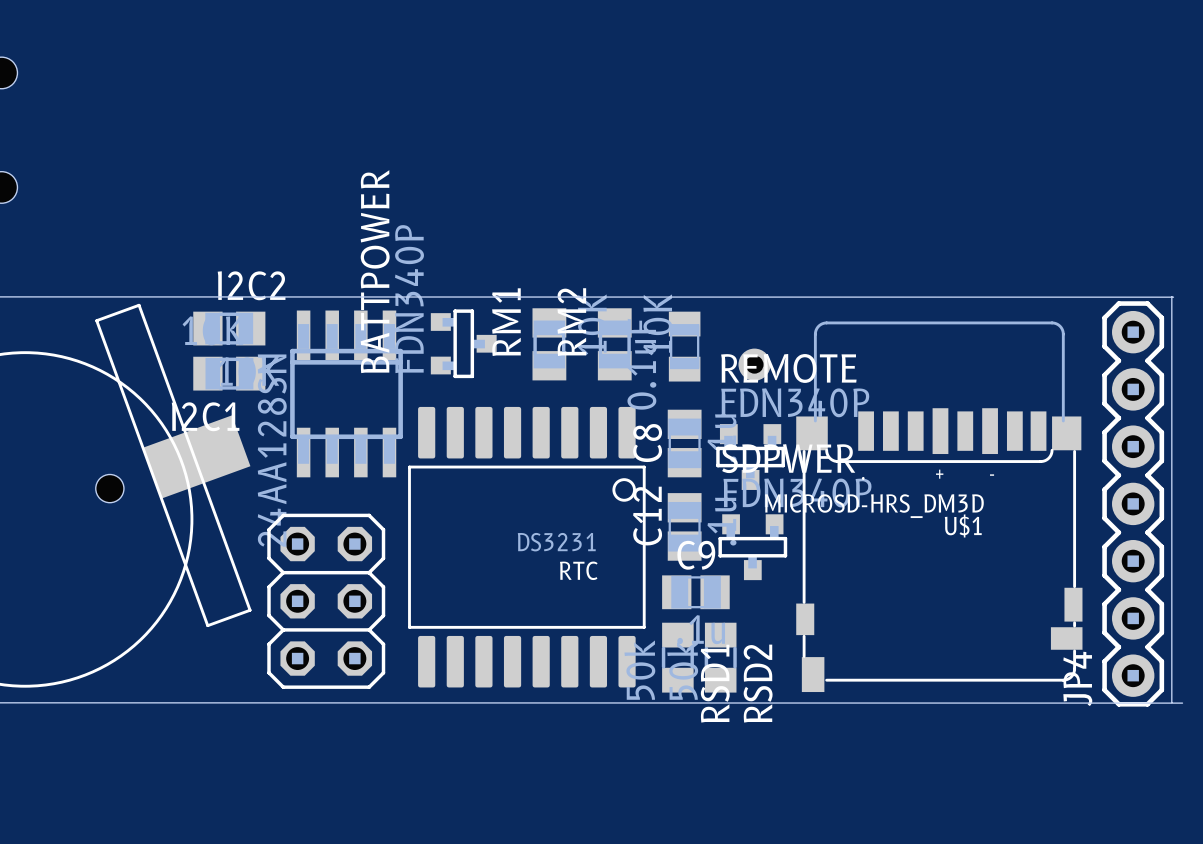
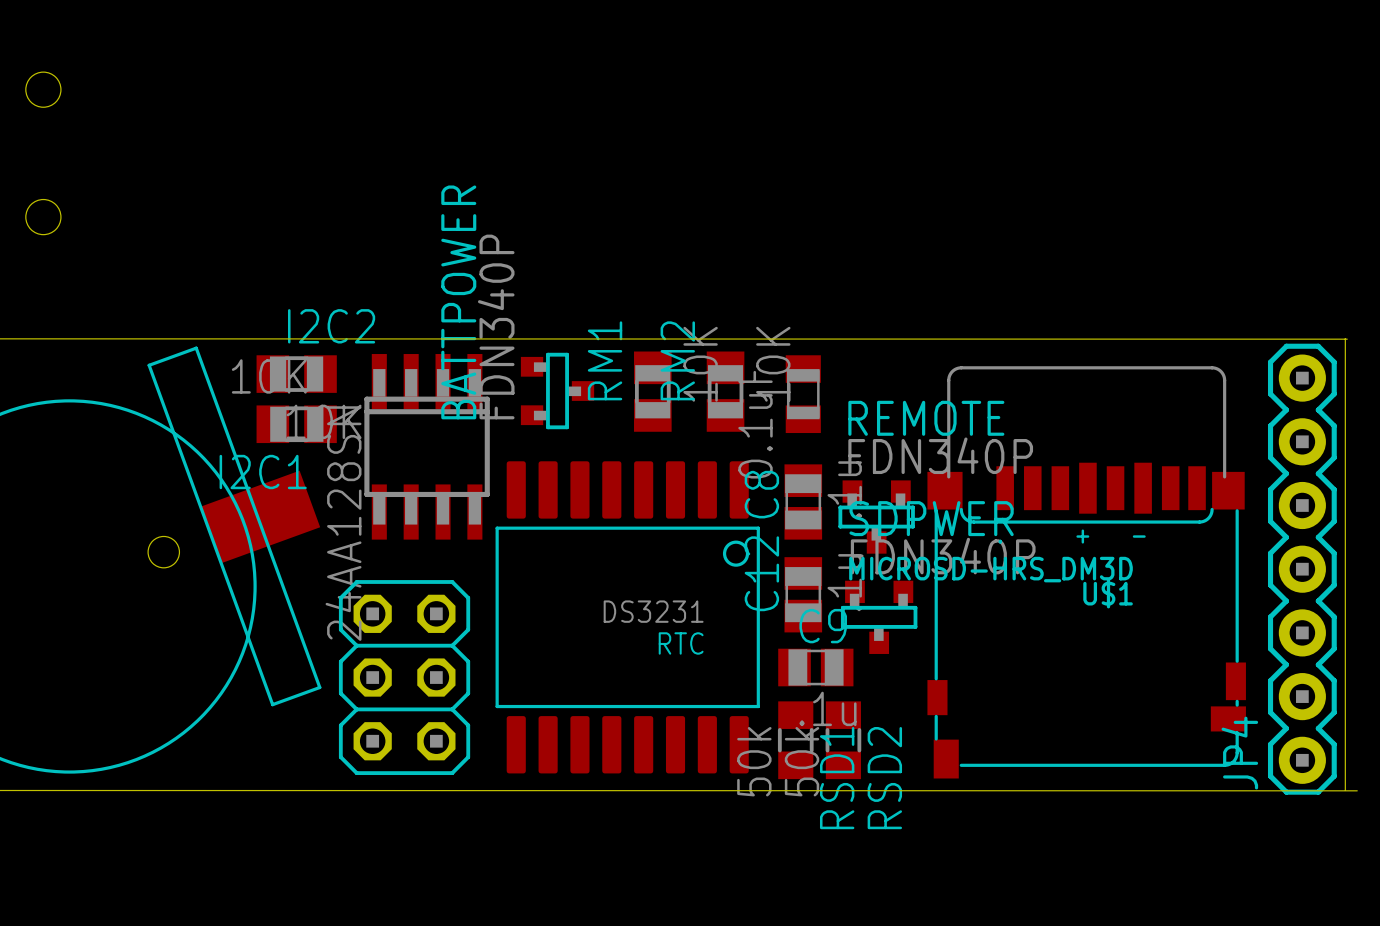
part: (754, 364) -> none

